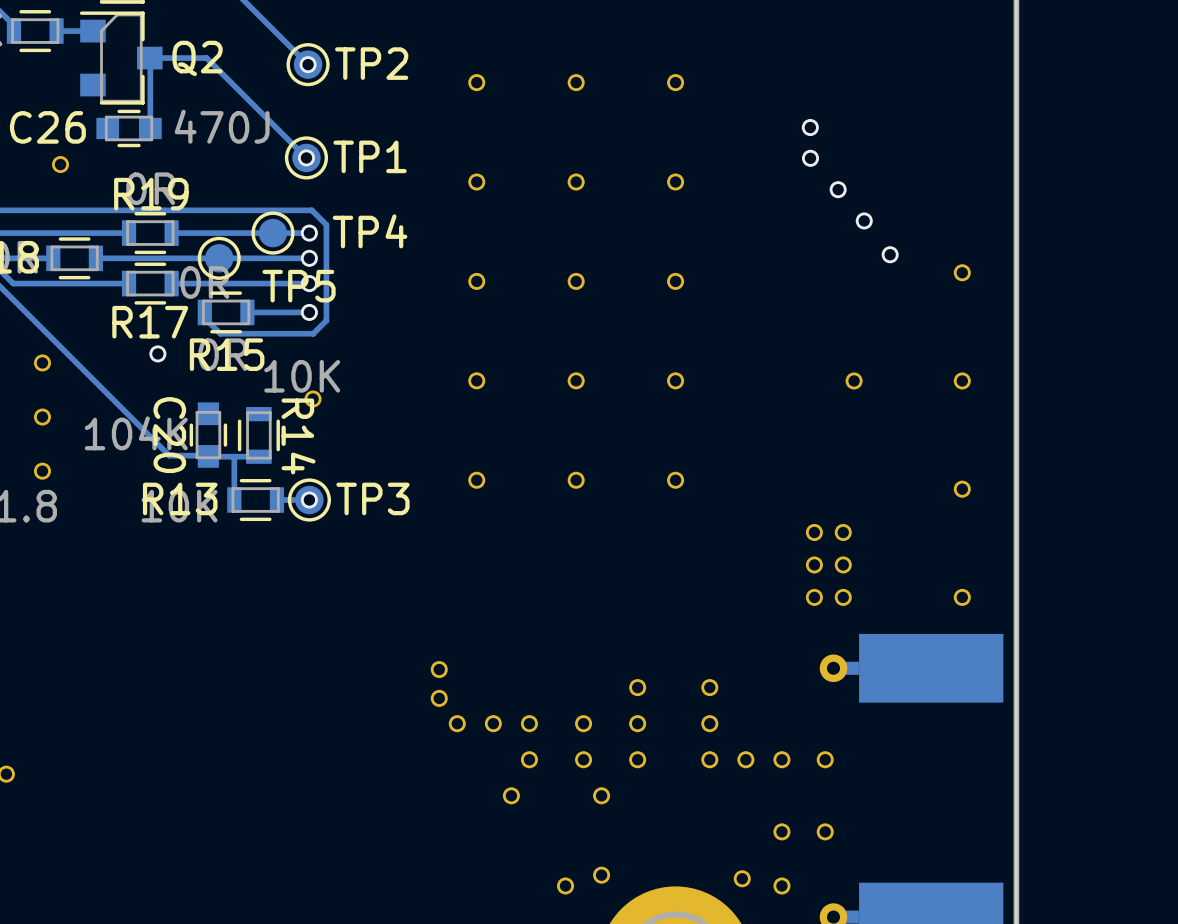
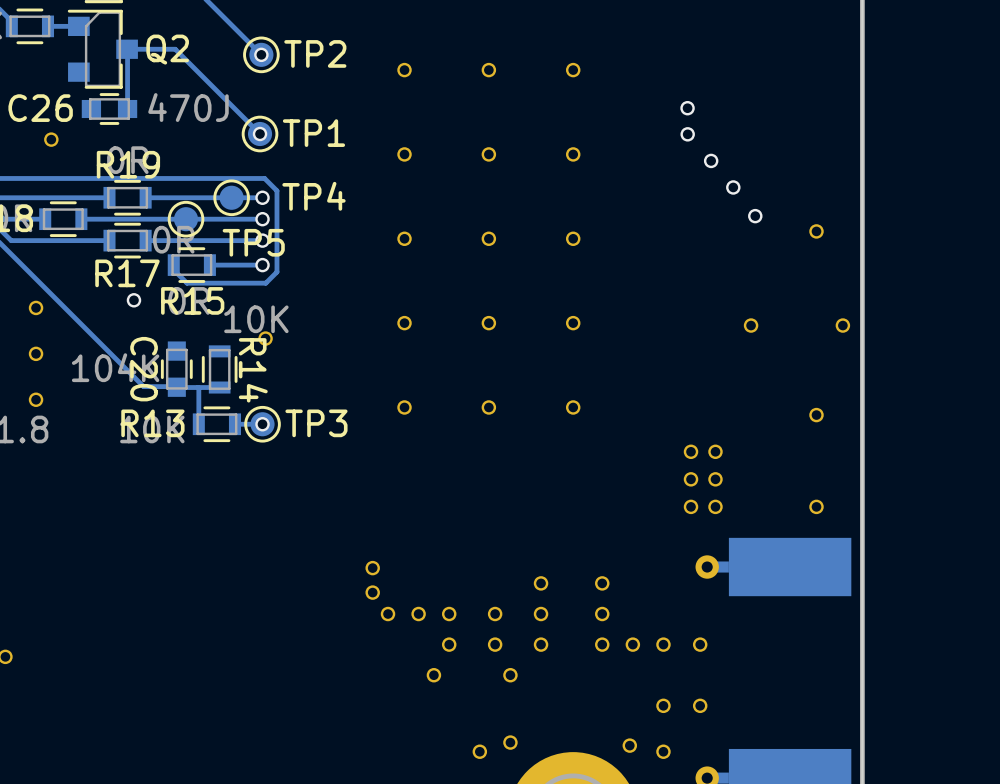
part position: (854, 380) -> (751, 325)
part position: (962, 380) -> (842, 325)

